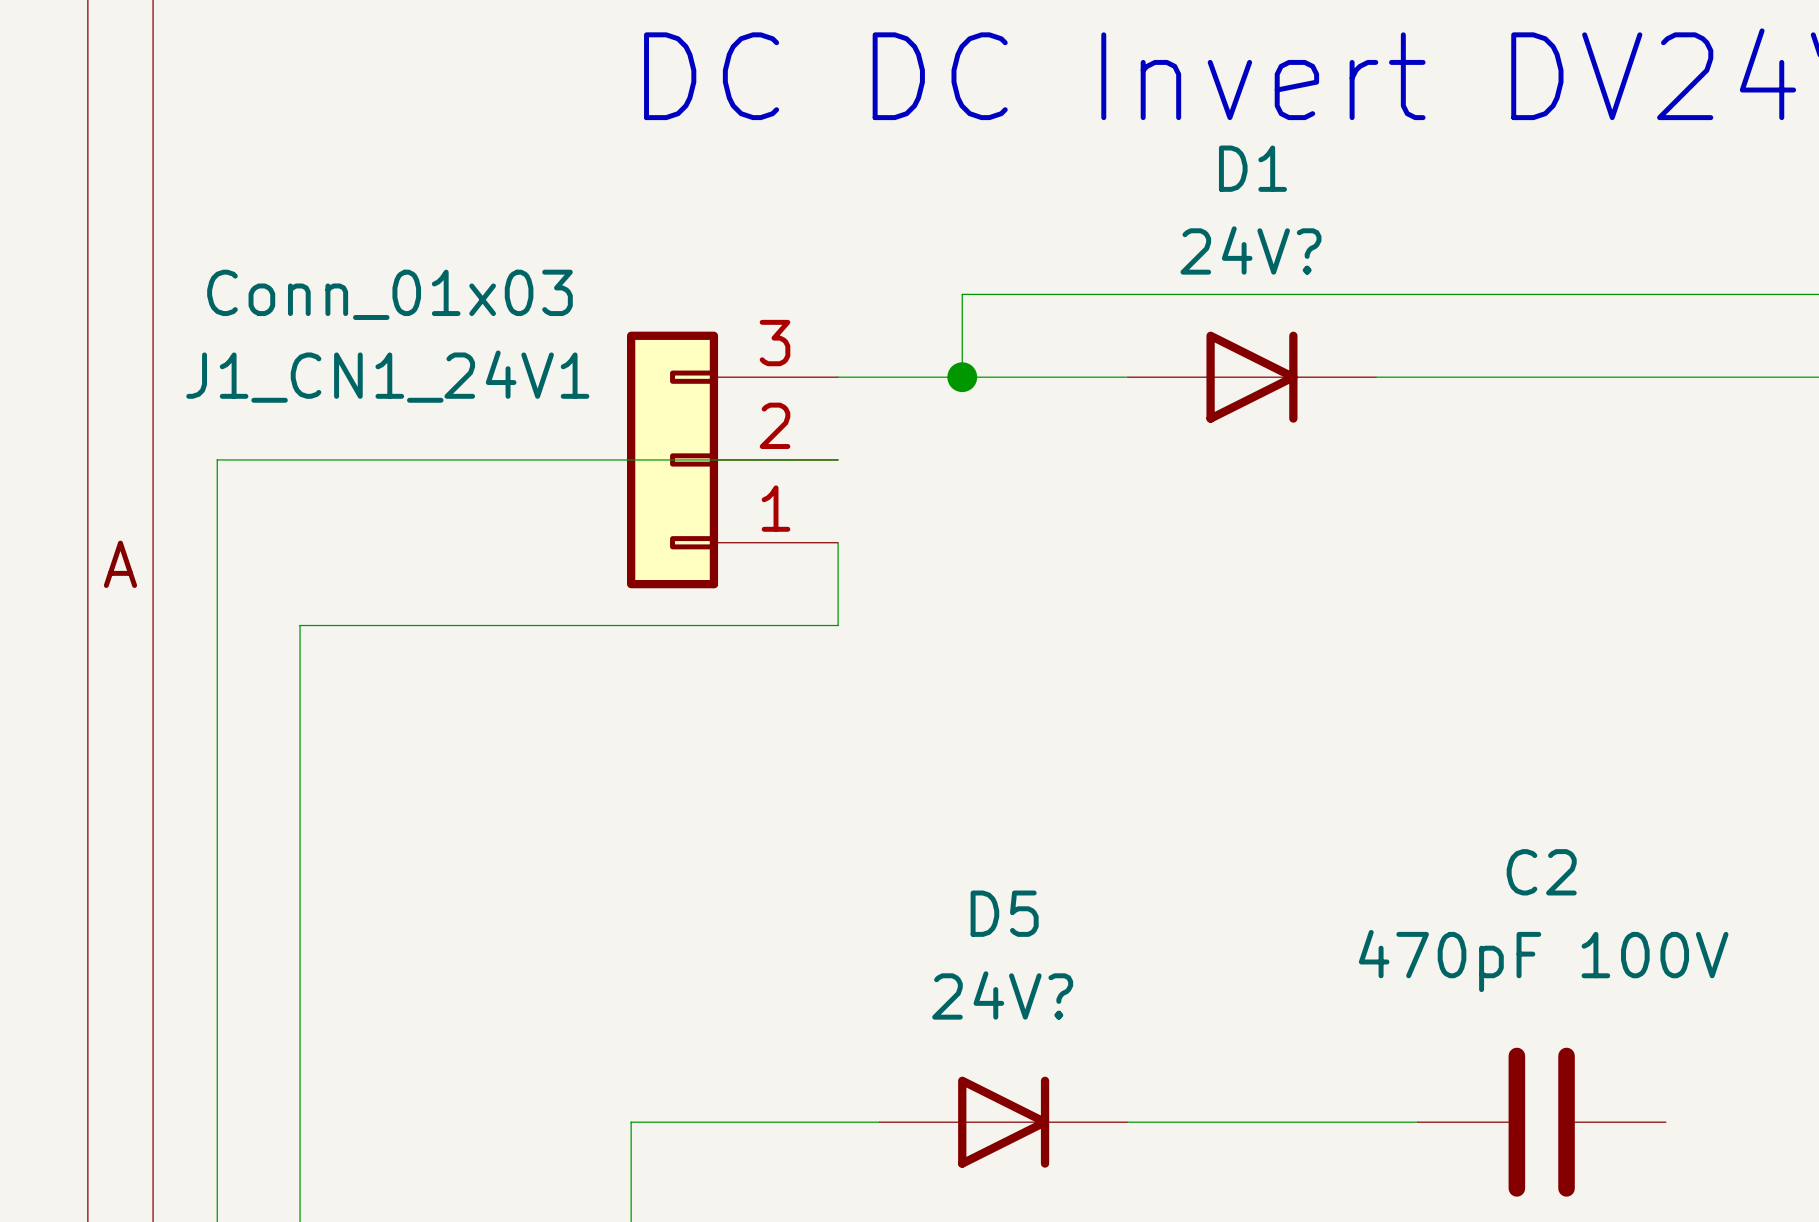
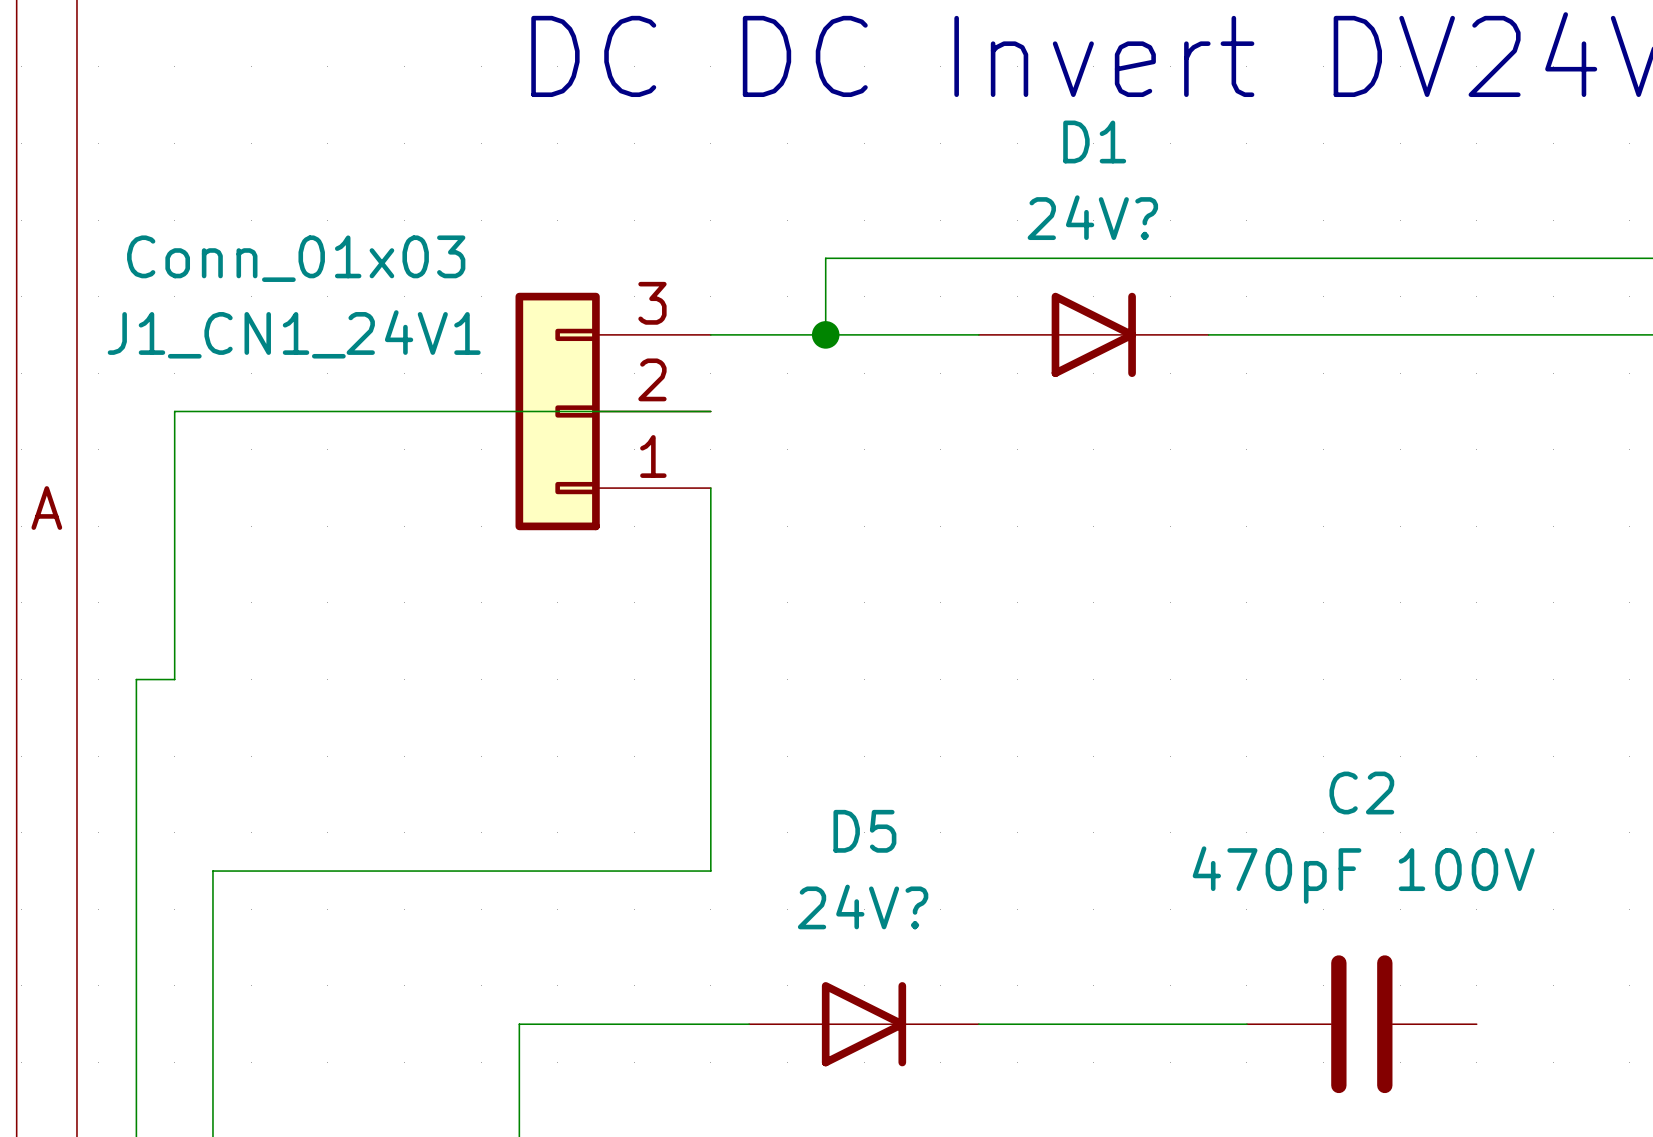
wire: (258, 459) (217, 459) (217, 749) -> (174, 411) (174, 679) (136, 679)
wire: (838, 625) (300, 625) (300, 956) -> (710, 564) (710, 871) (212, 871)

